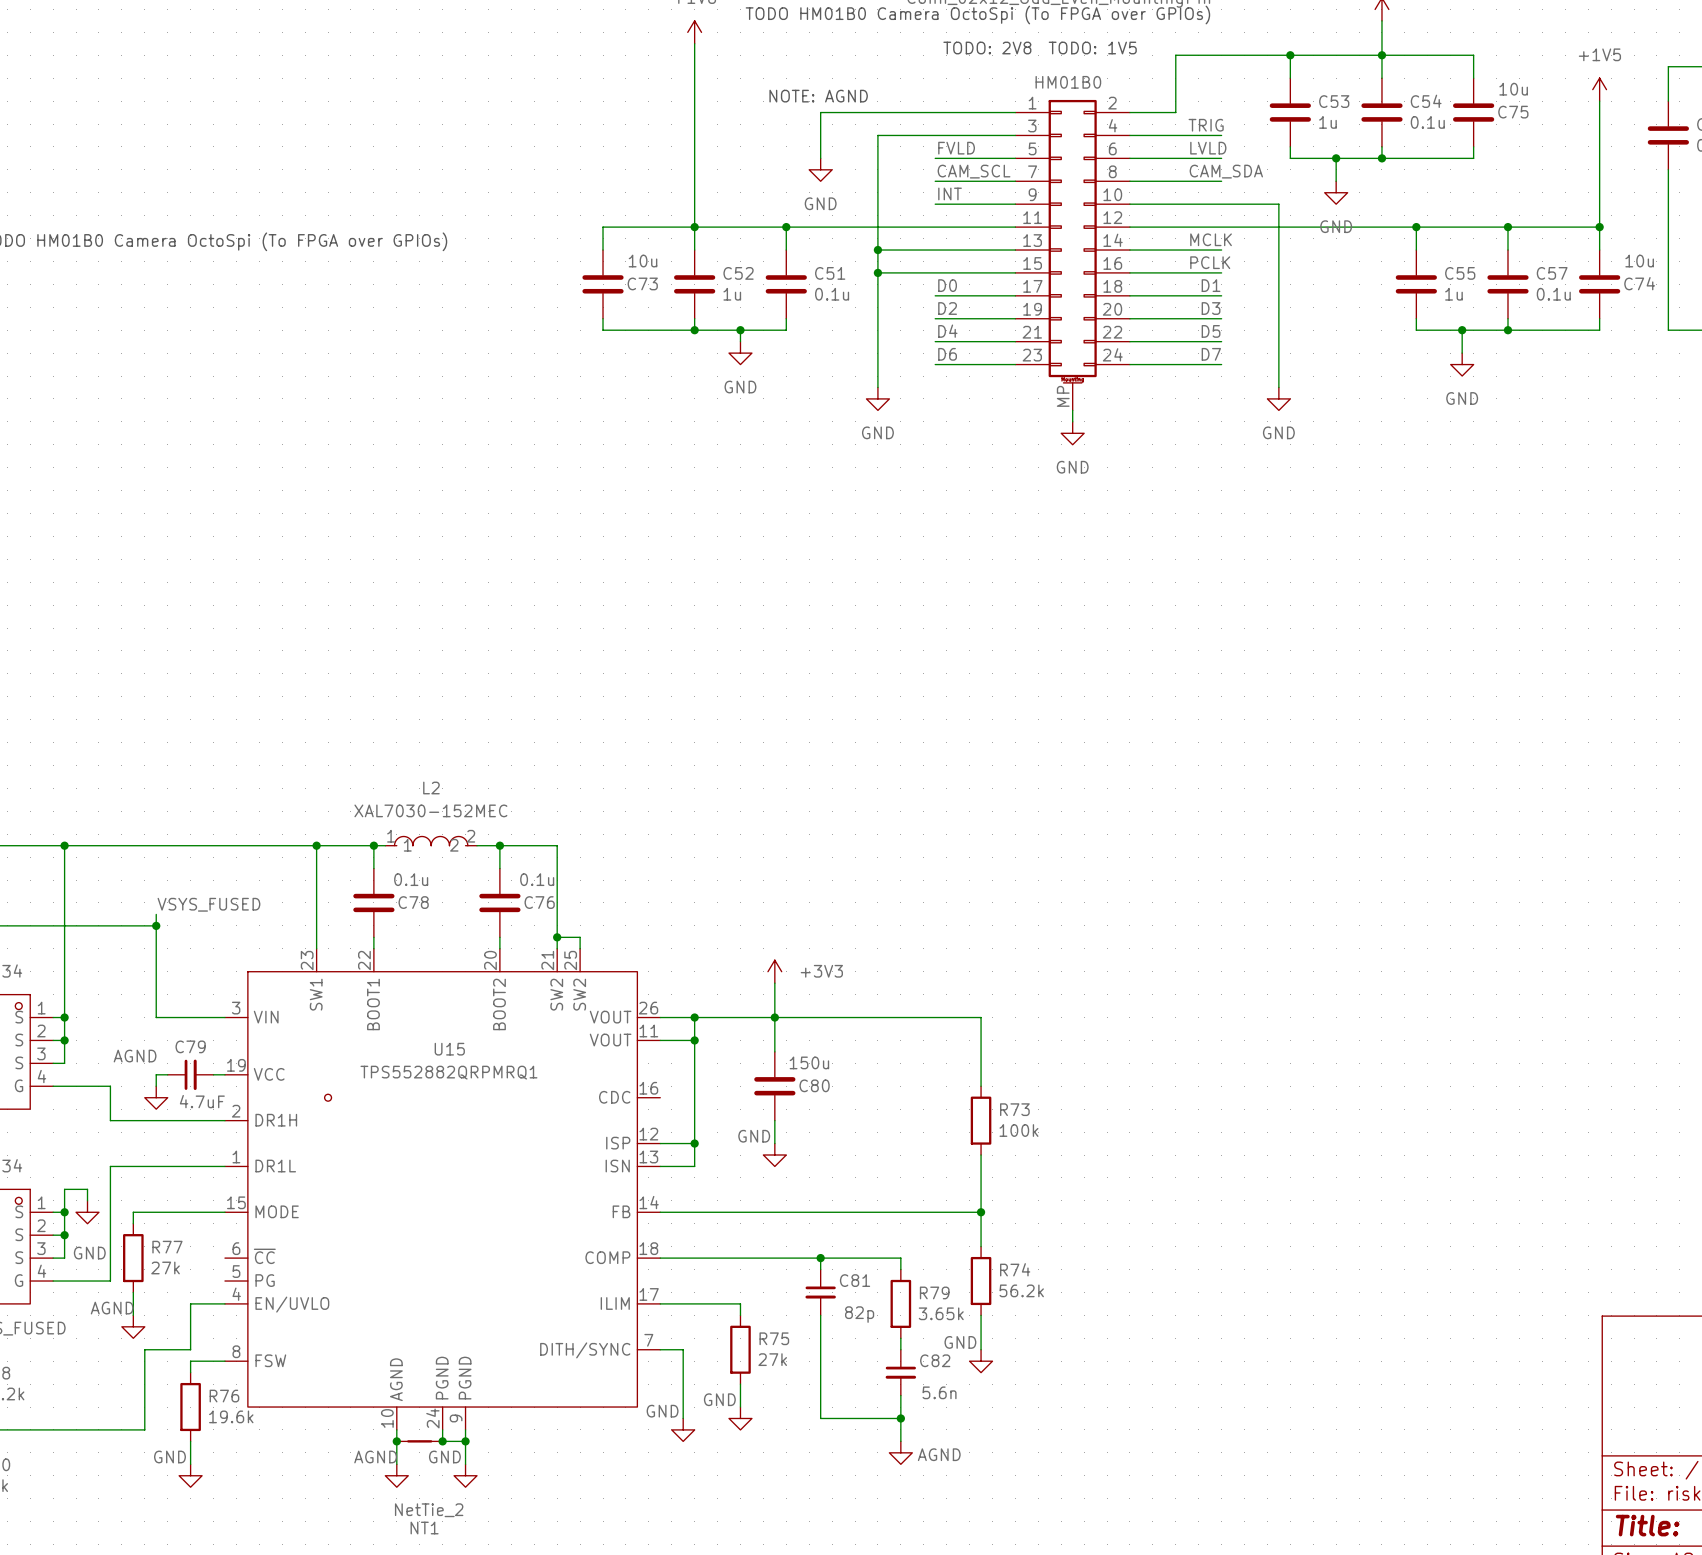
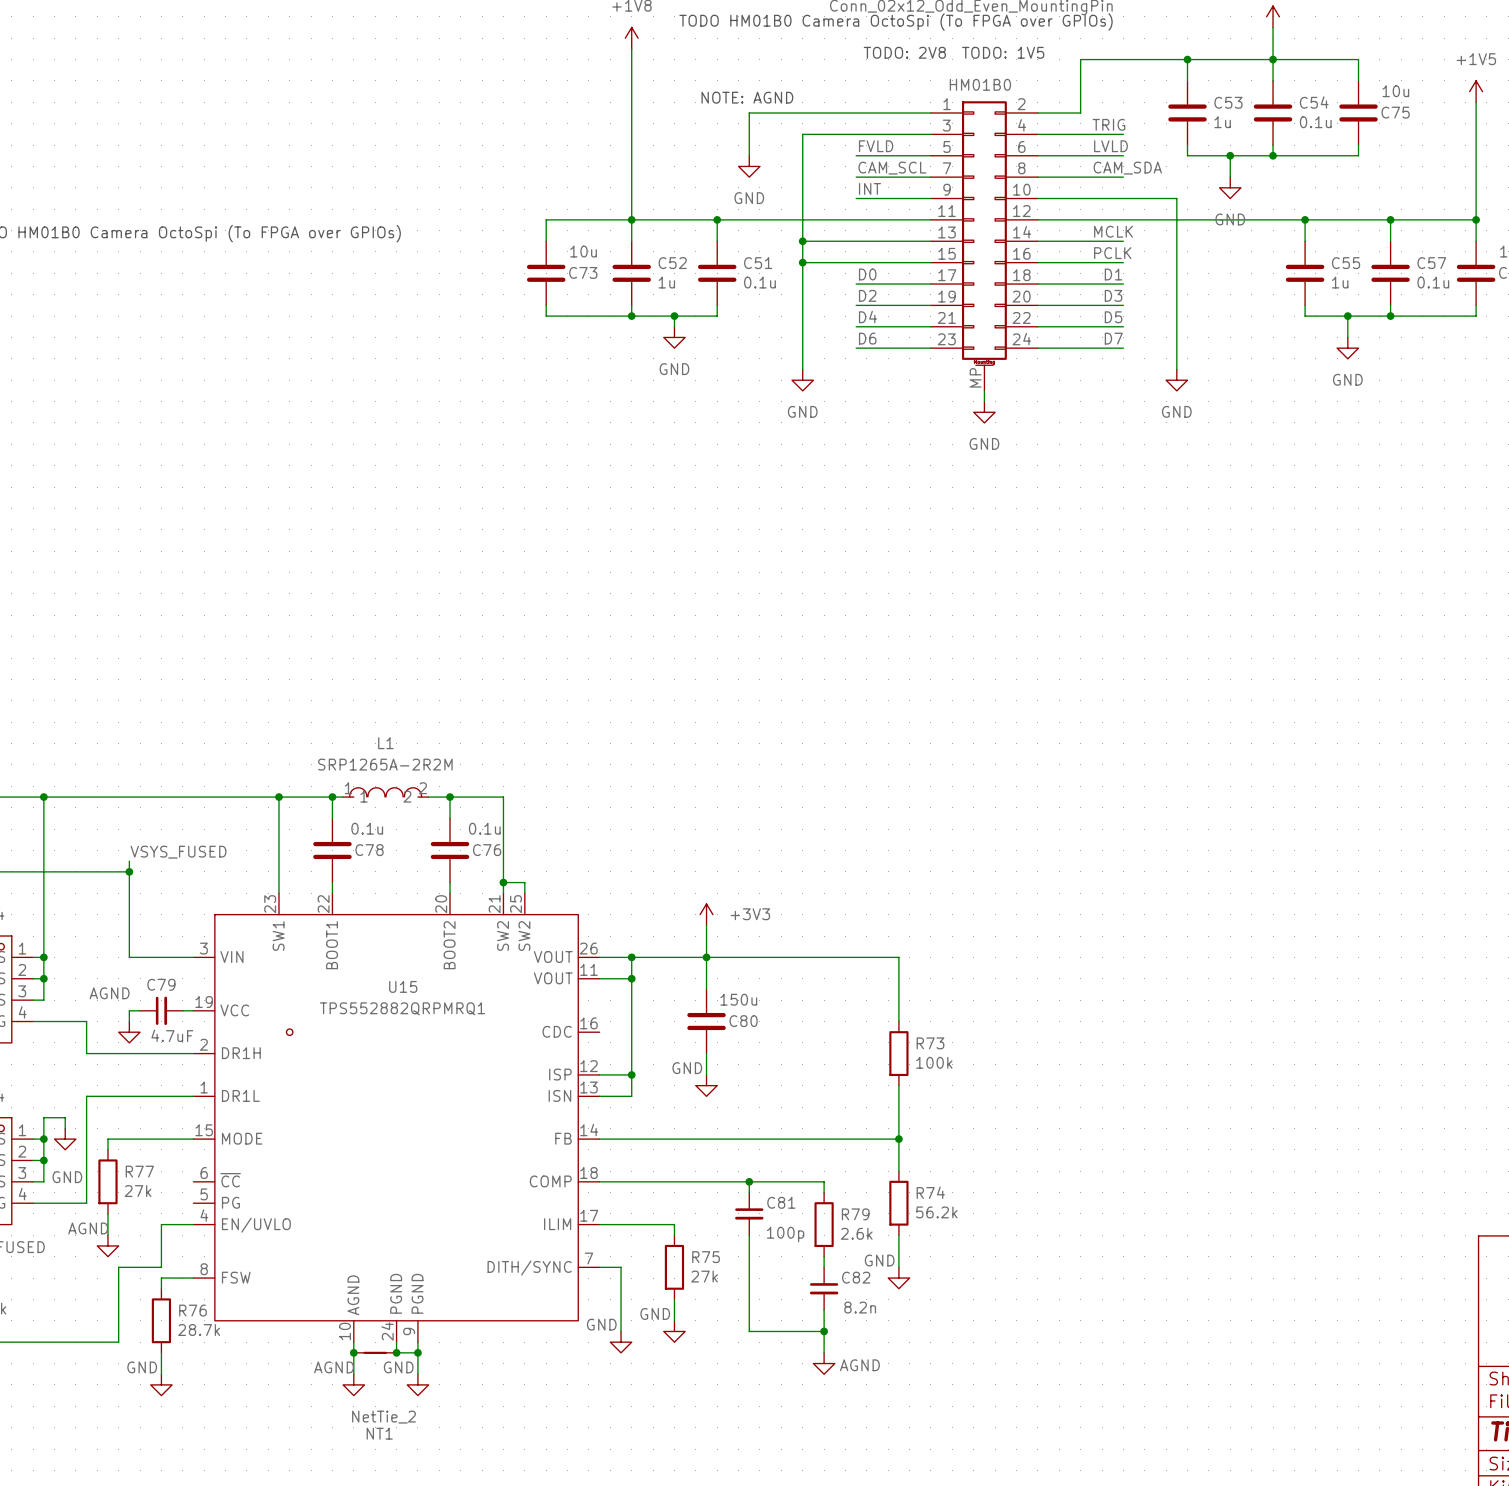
L1: none -> SRP1265A-2R2M (385, 792)
L2: XAL7030-152MEC (431, 841) -> none
R79 value: 3.65k (941, 1313) -> 2.6k (856, 1233)
C81 value: 82p (859, 1314) -> 100p (785, 1234)
C82 value: 5.6n (939, 1392) -> 8.2n (860, 1307)
R76 value: 19.6k (231, 1416) -> 28.7k (199, 1330)

